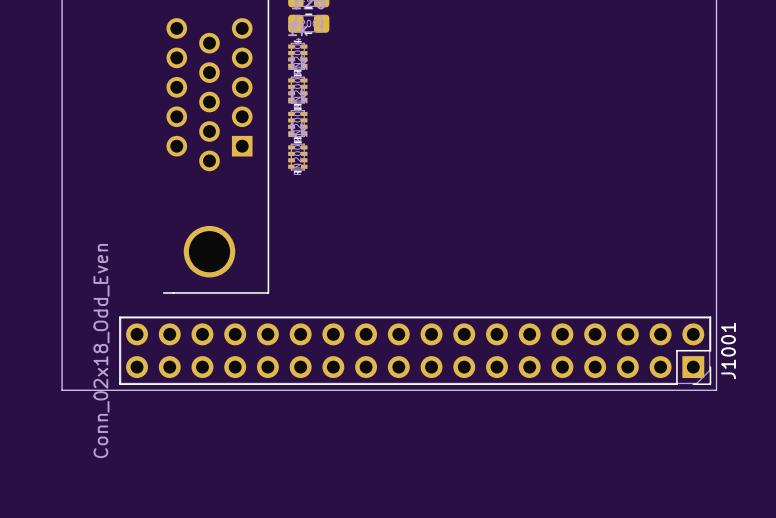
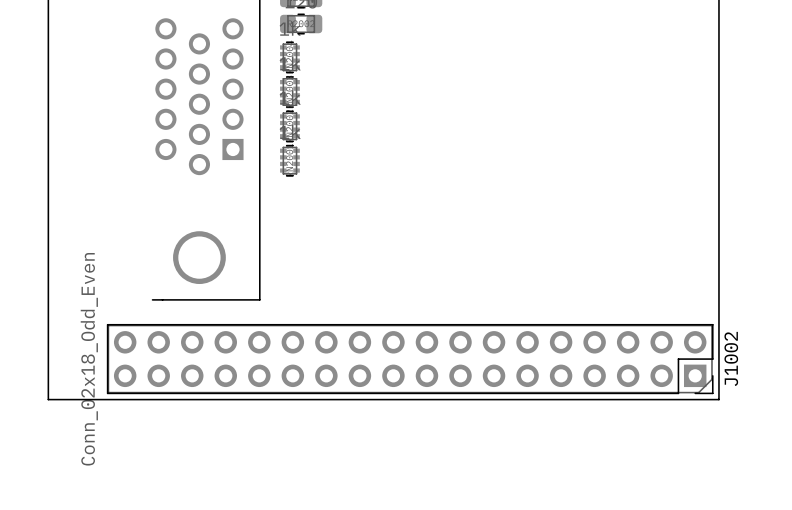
J1001 name: J1001 (728, 351) -> J1002 (731, 358)

